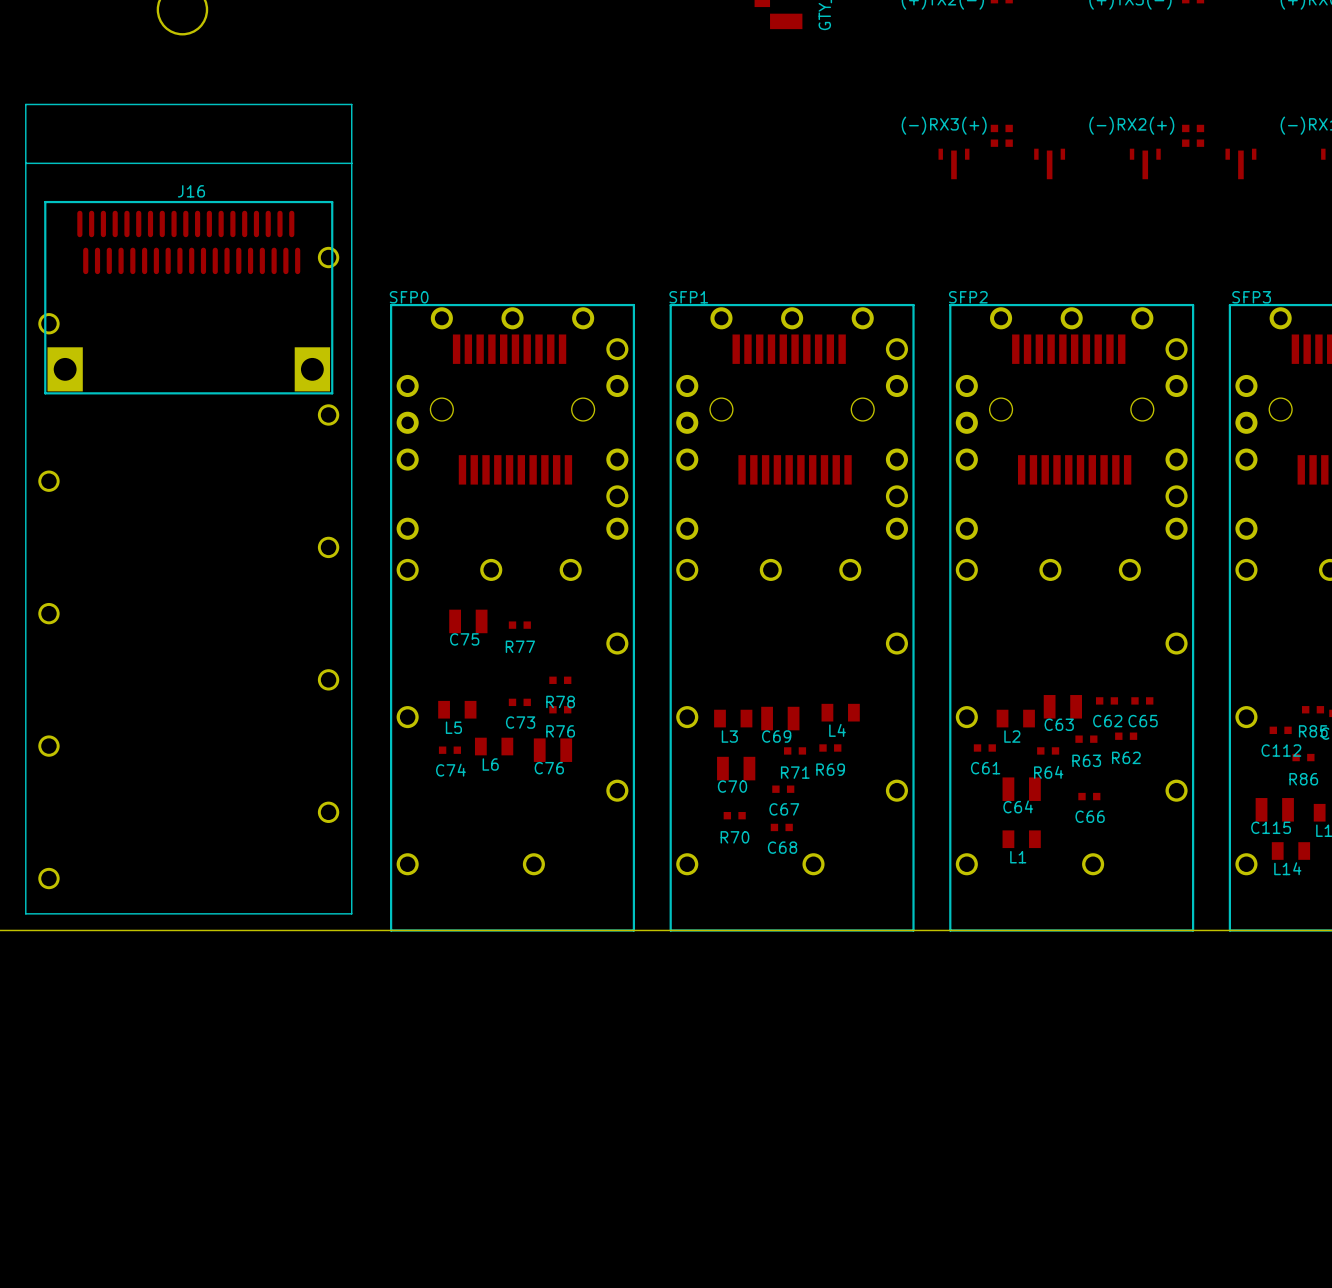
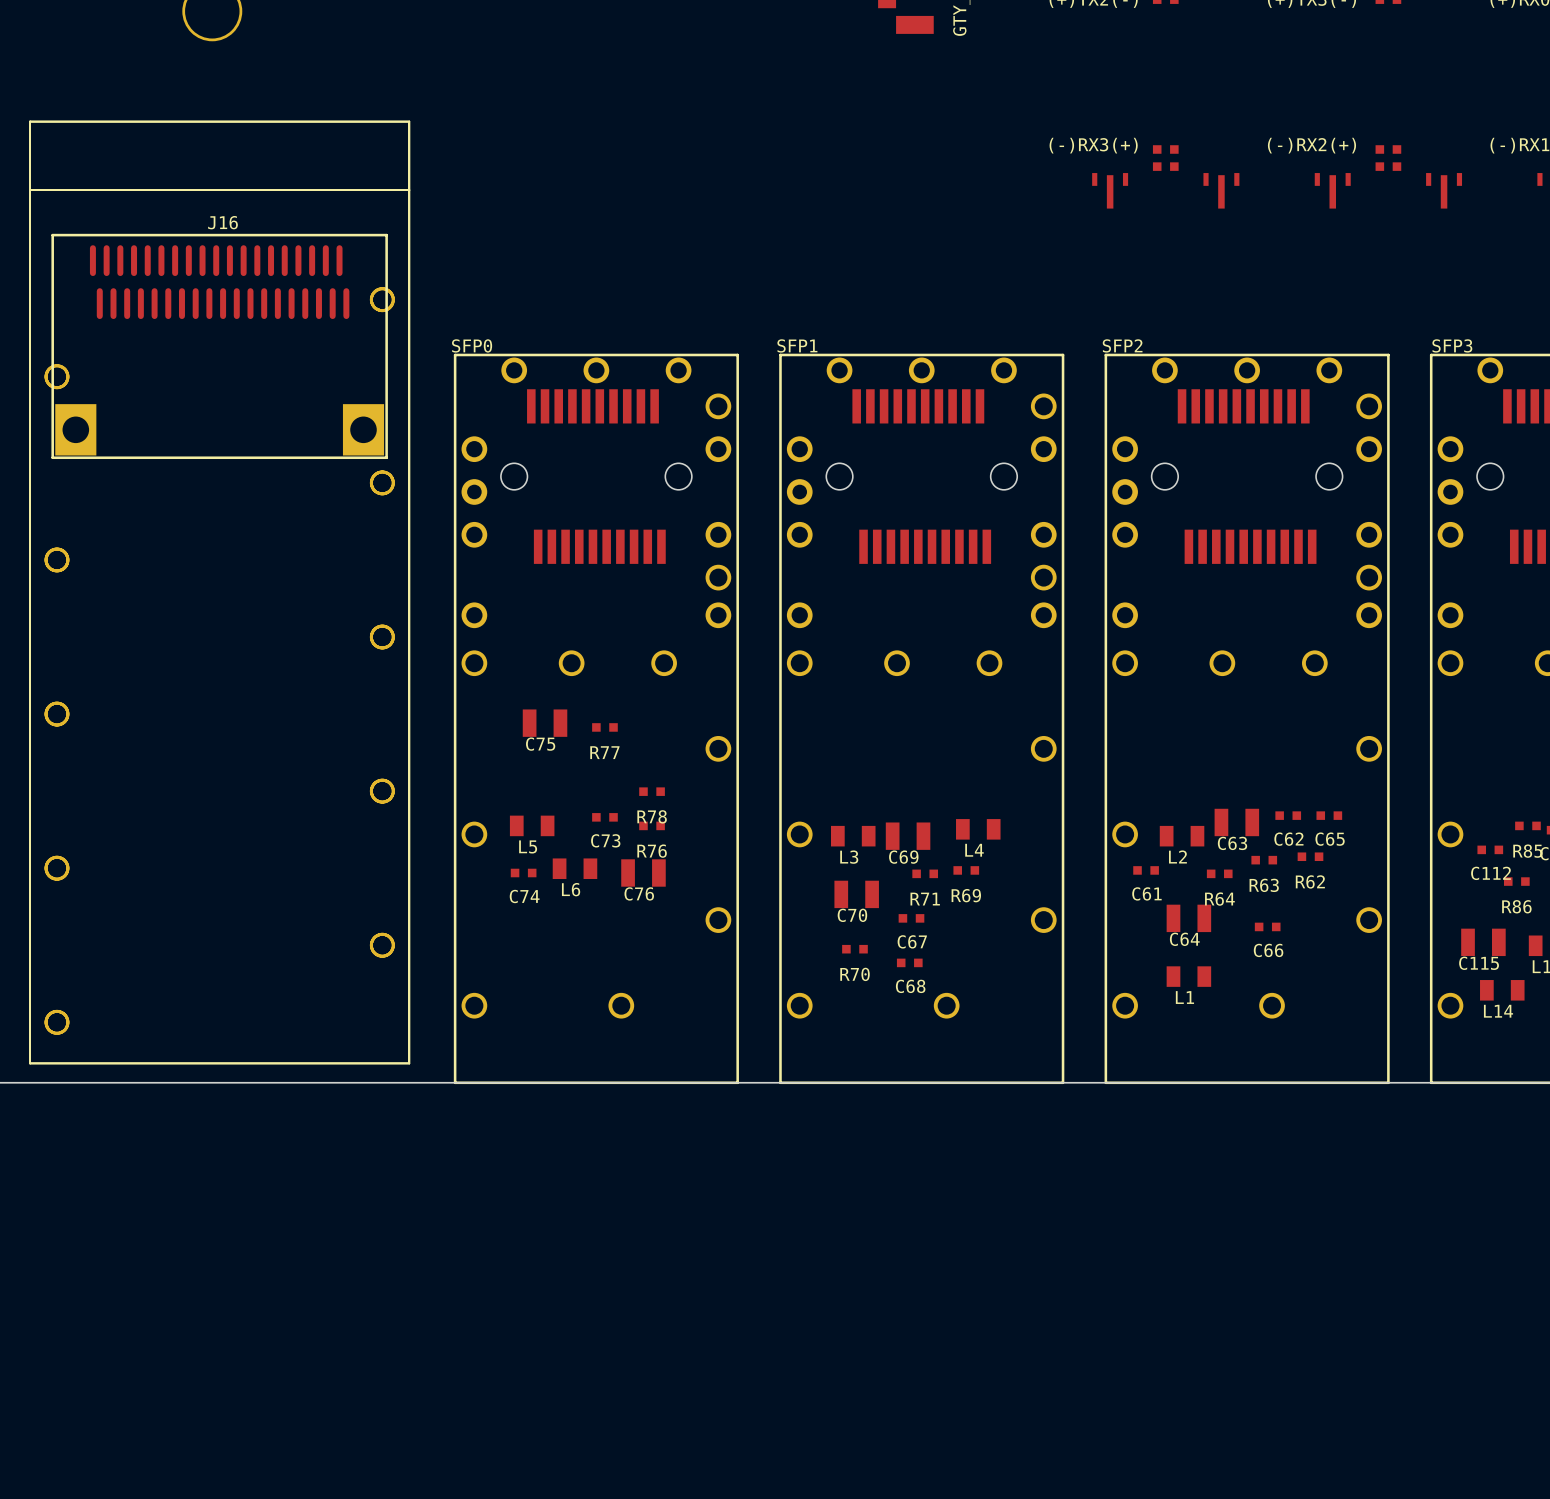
part: none -> (219, 592)

